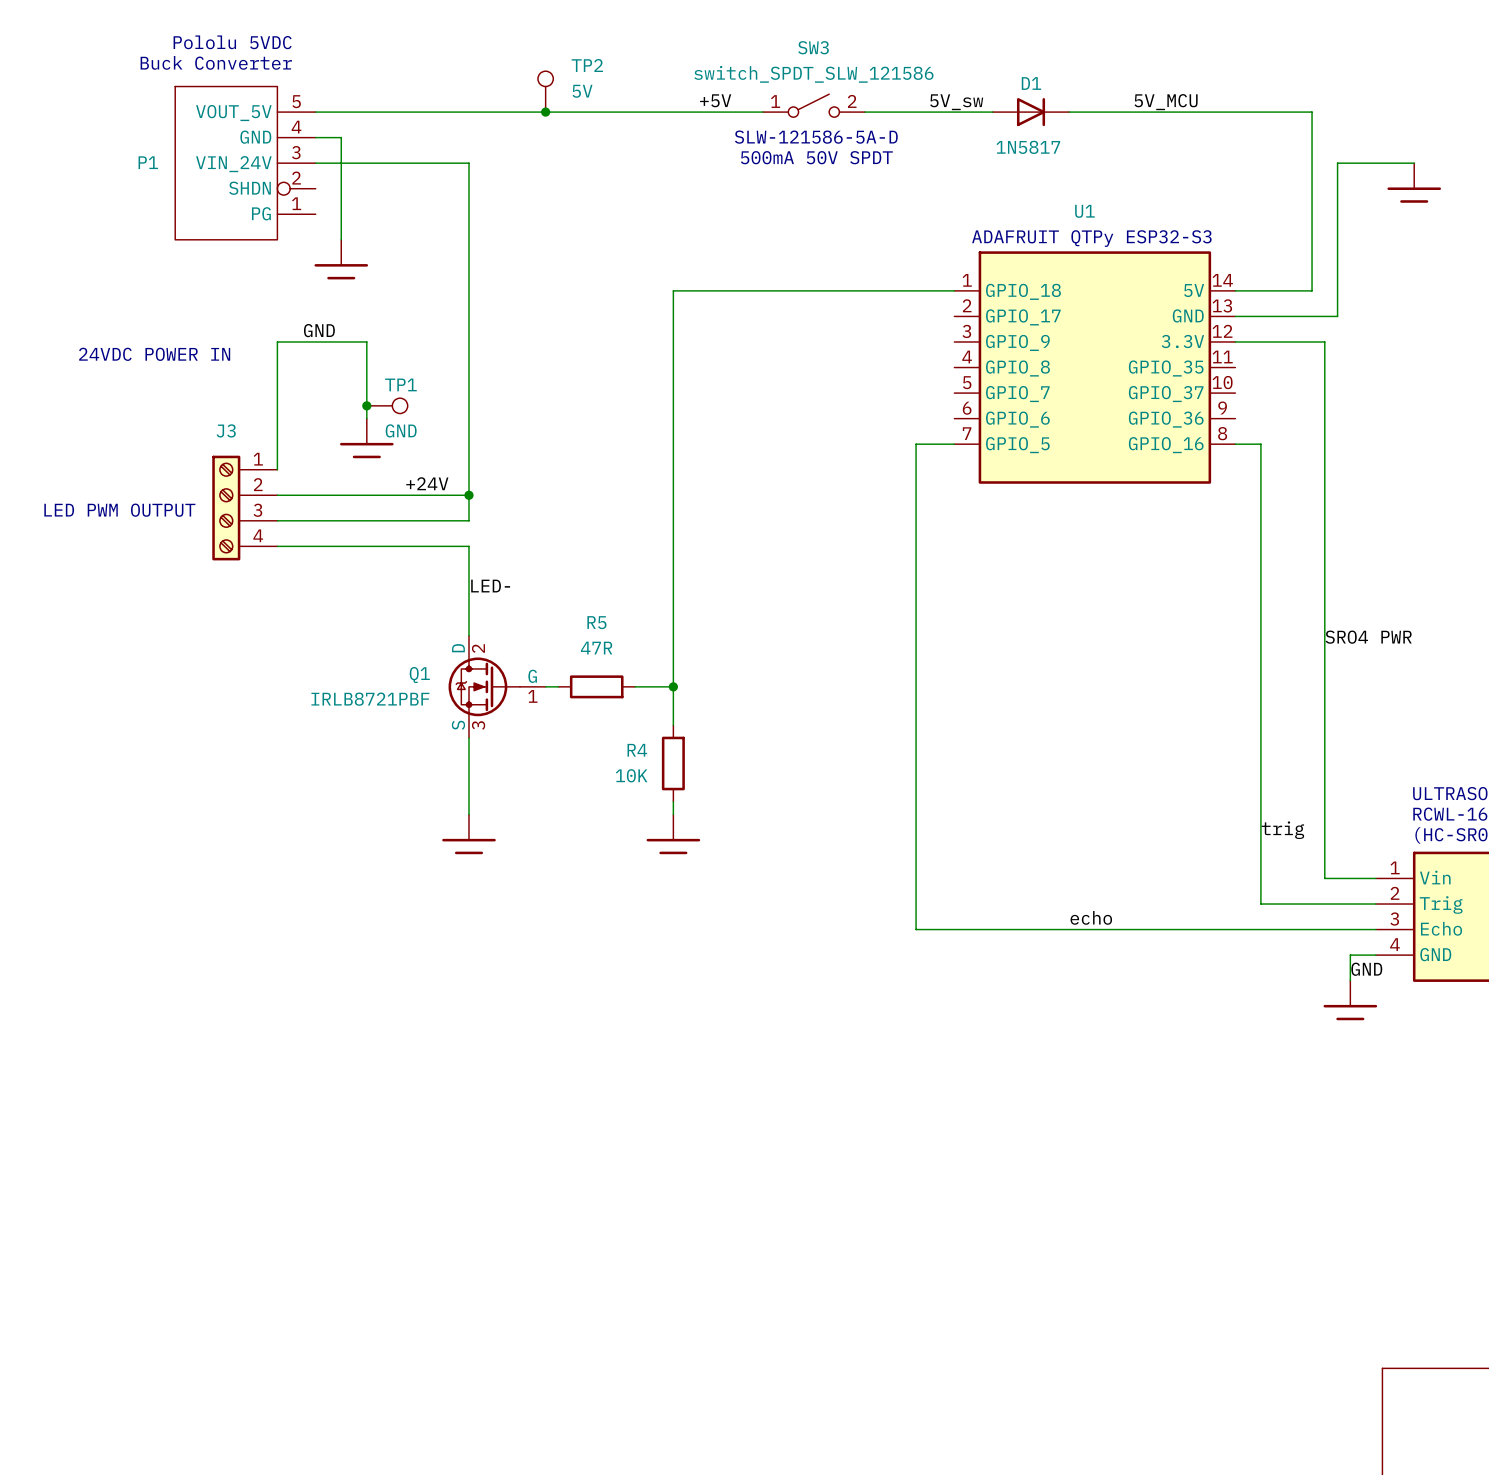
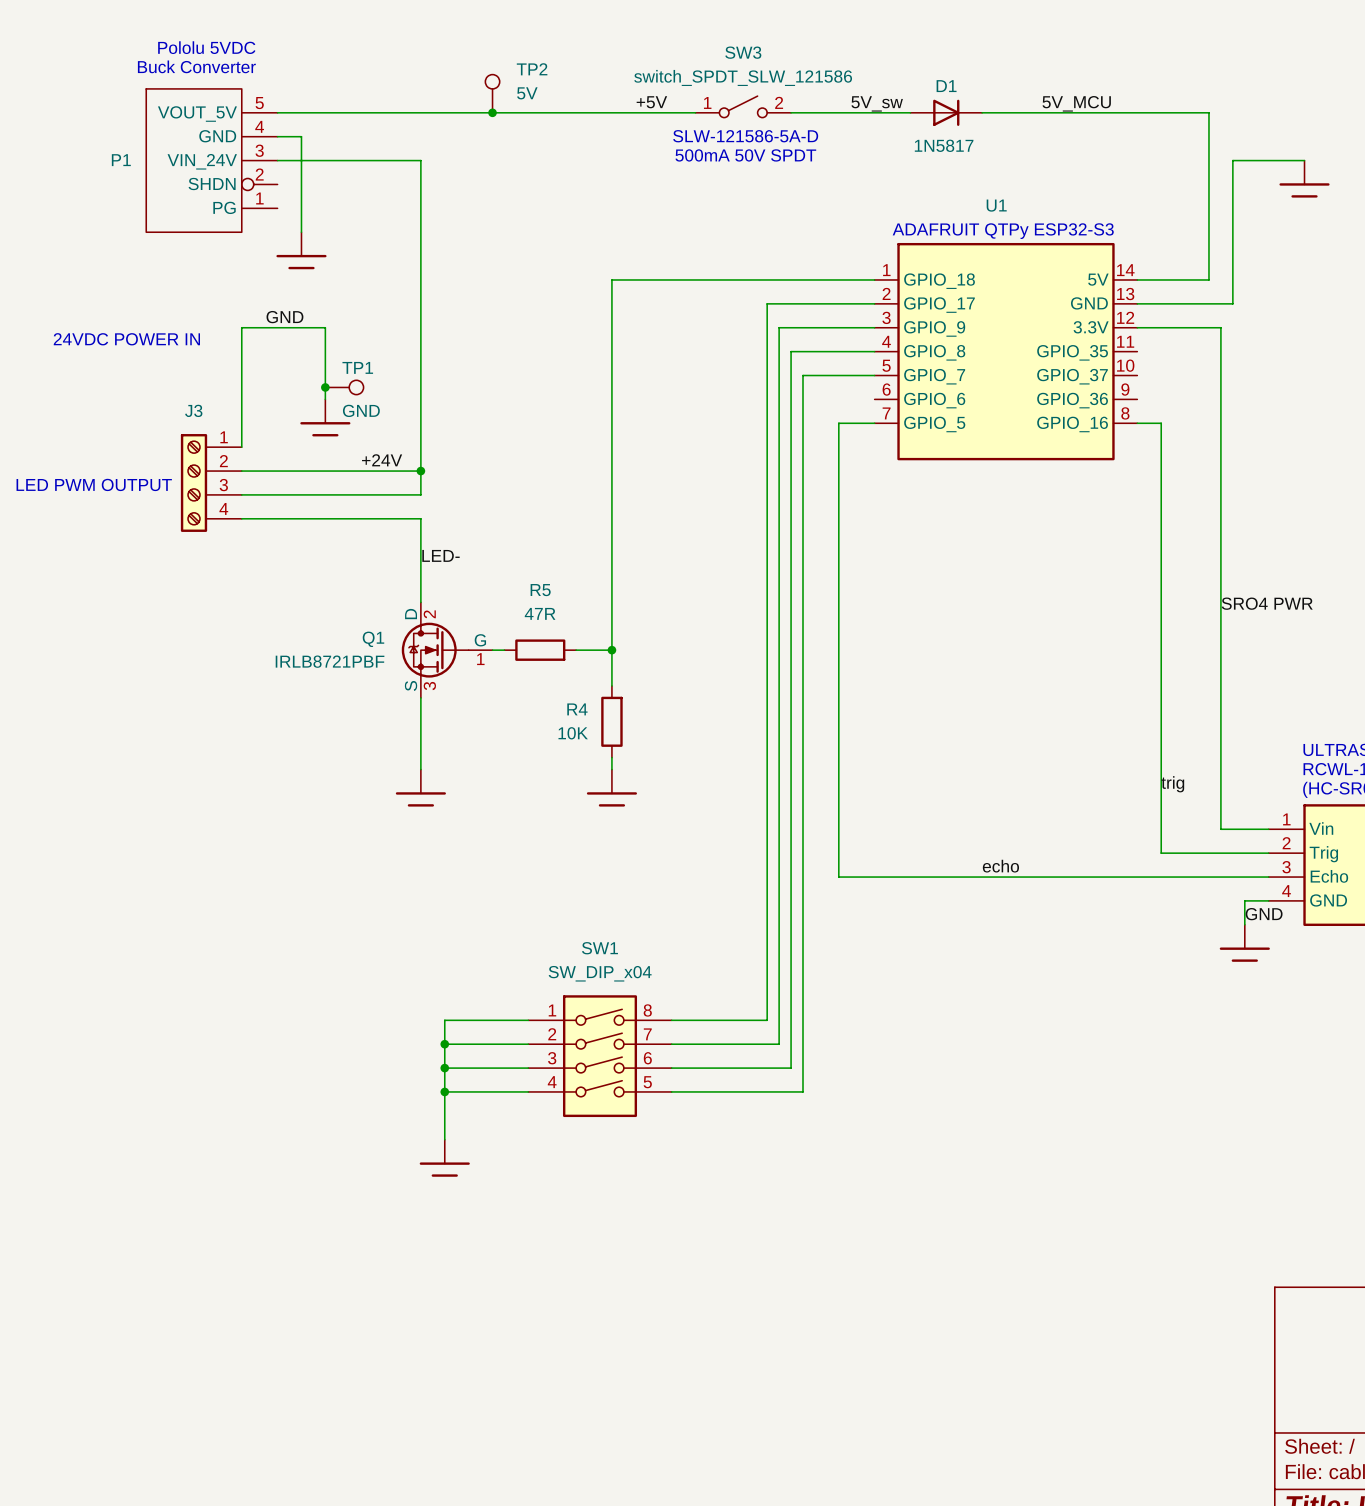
wire: none -> (874, 303) (767, 303) (767, 1020) (671, 1020)
wire: none -> (874, 327) (779, 327) (779, 1044) (671, 1044)
wire: none -> (874, 351) (791, 351) (791, 1068) (671, 1068)
wire: none -> (874, 375) (802, 375) (802, 1091) (671, 1091)
wire: none -> (528, 1020) (444, 1020) (444, 1139)
wire: none -> (444, 1044) (528, 1044)
junction: none -> (444, 1044)
SW1: none -> SW_DIP_x04 (600, 1056)
wire: none -> (444, 1068) (528, 1068)
junction: none -> (444, 1068)
wire: none -> (444, 1091) (528, 1091)
junction: none -> (444, 1091)
power symbol: none -> (444, 1158)

